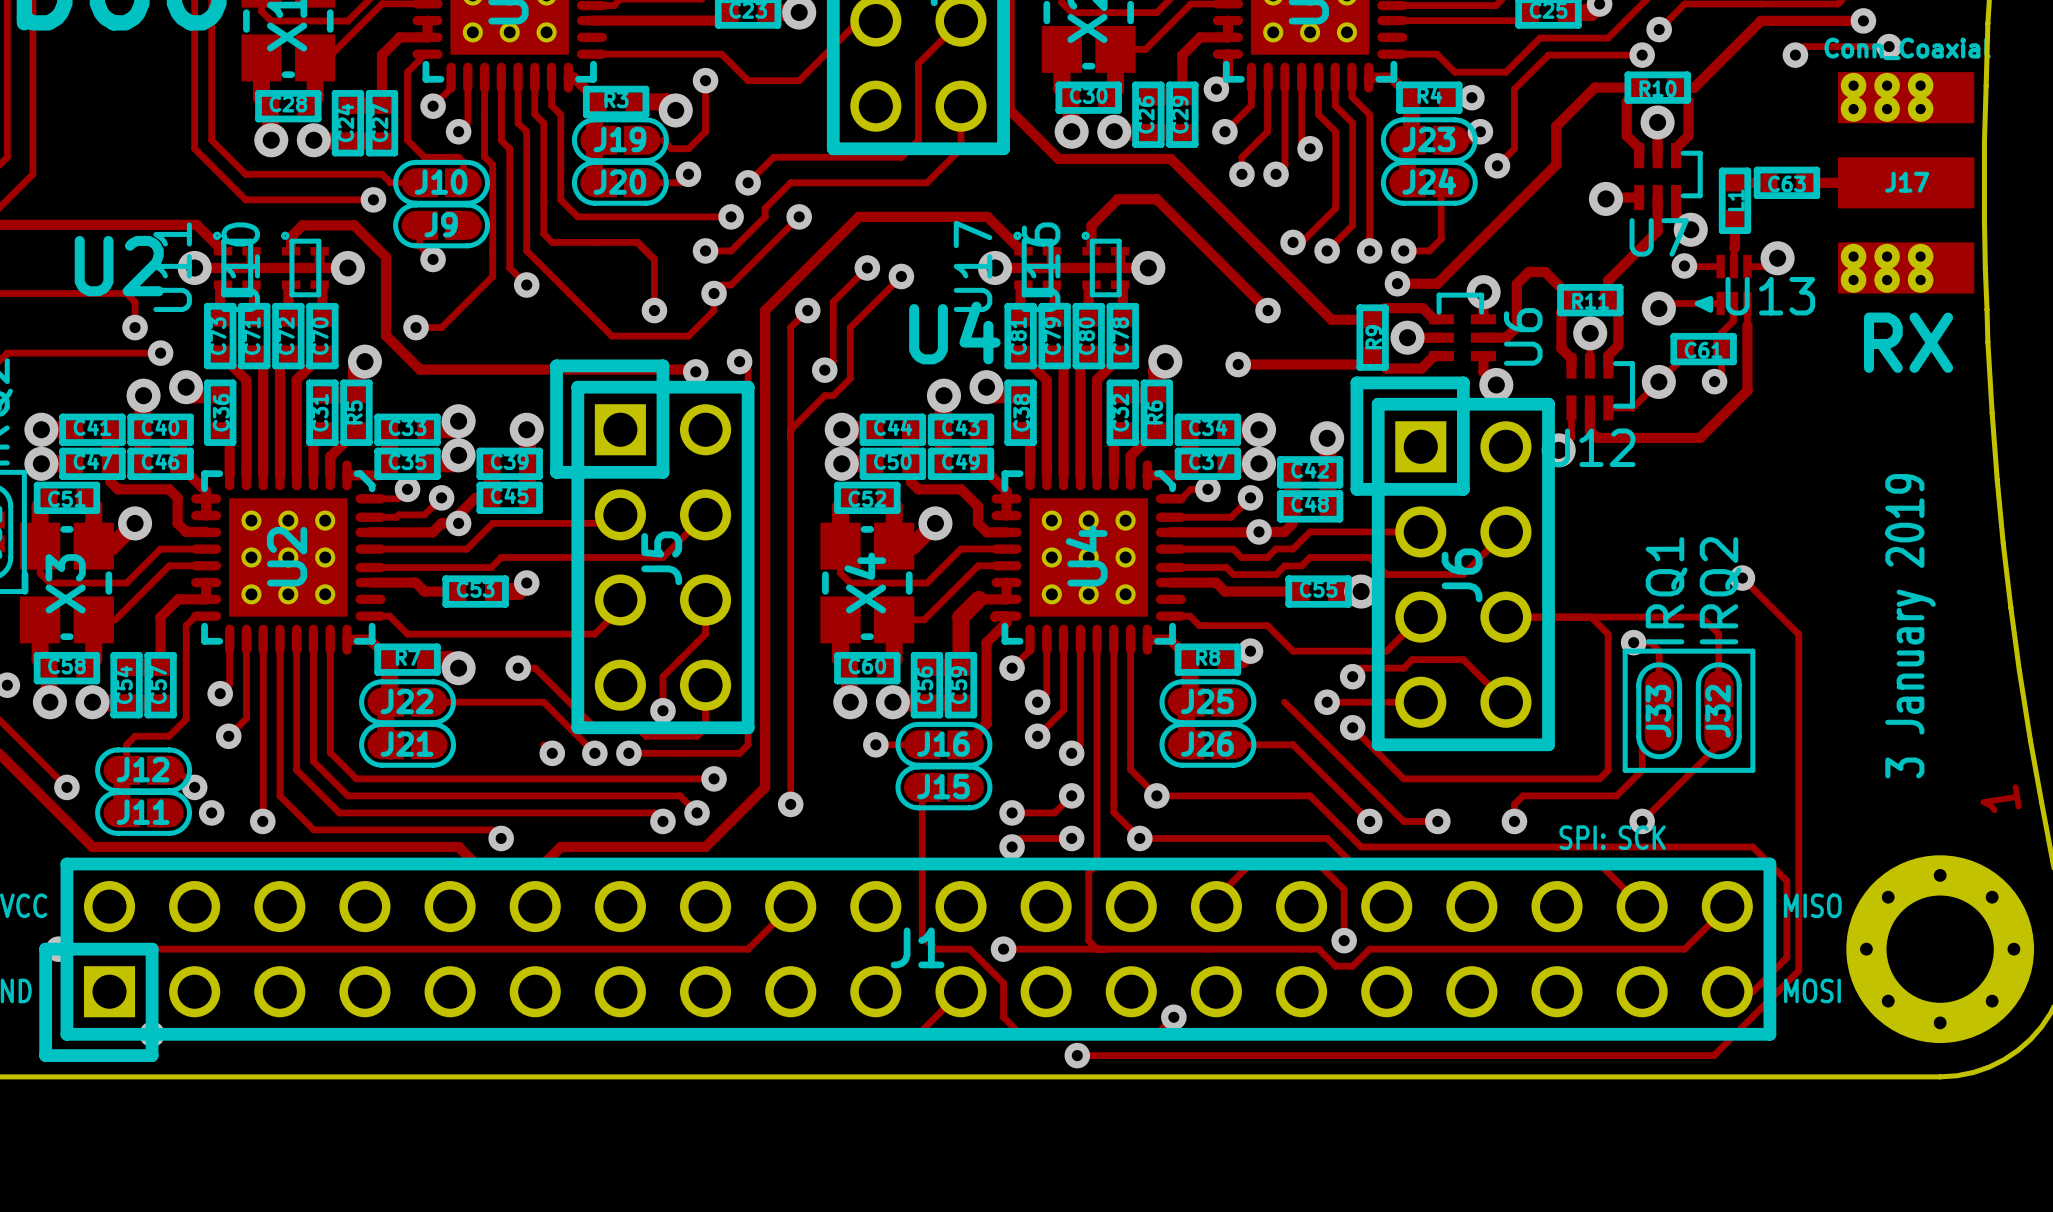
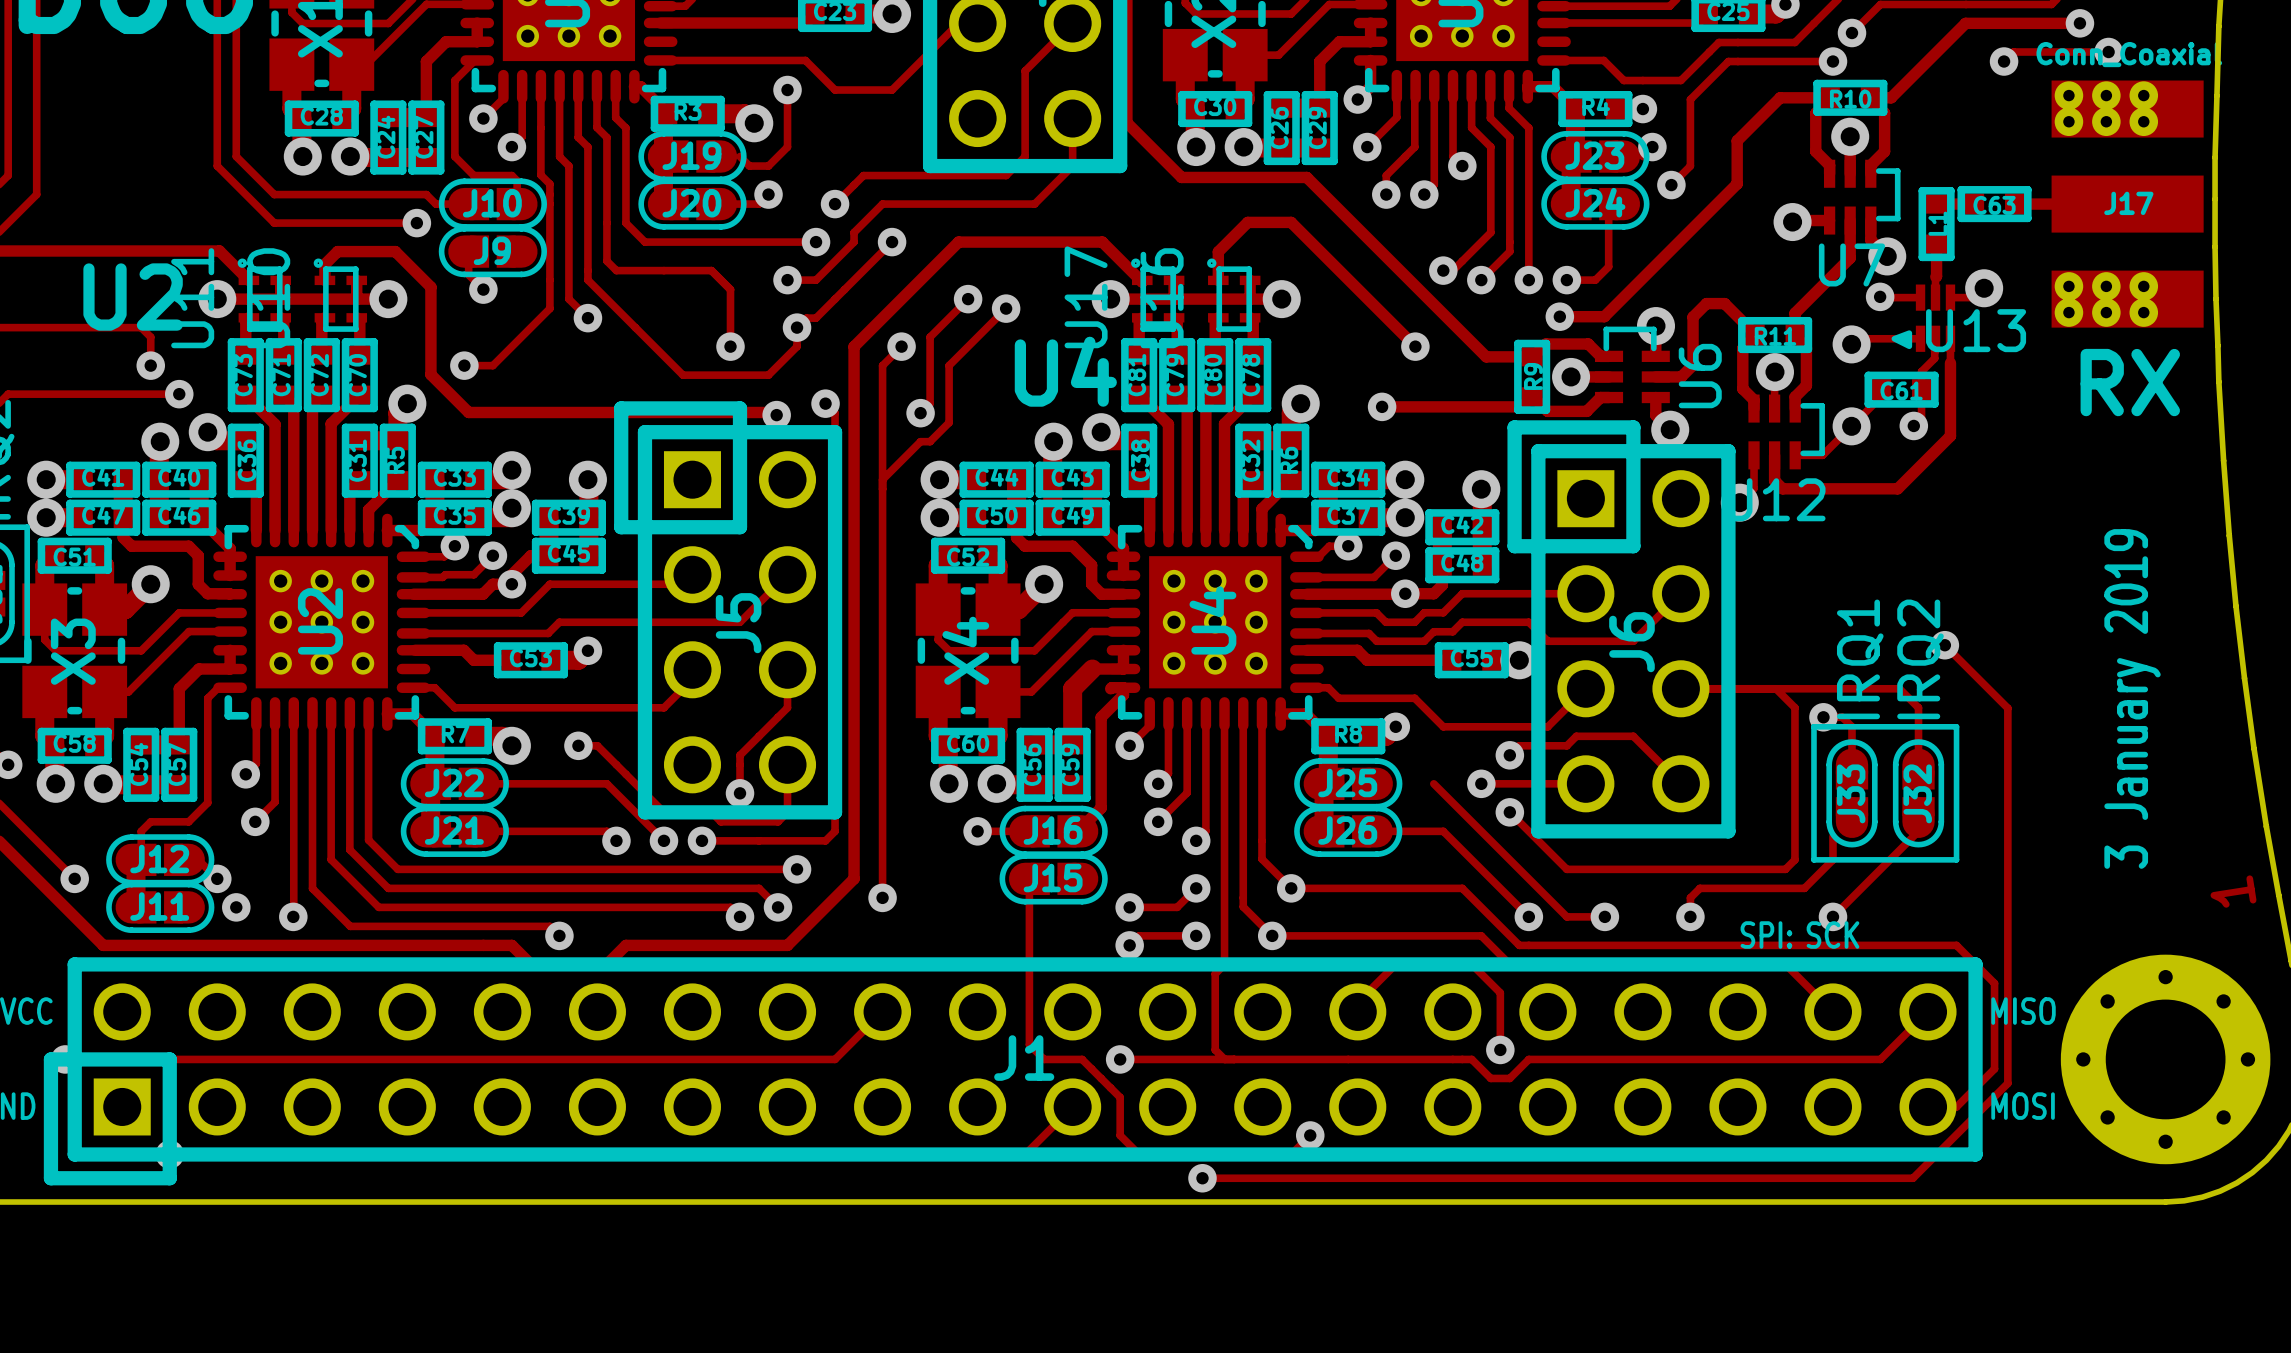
track: none -> (430, 831) (606, 831)

